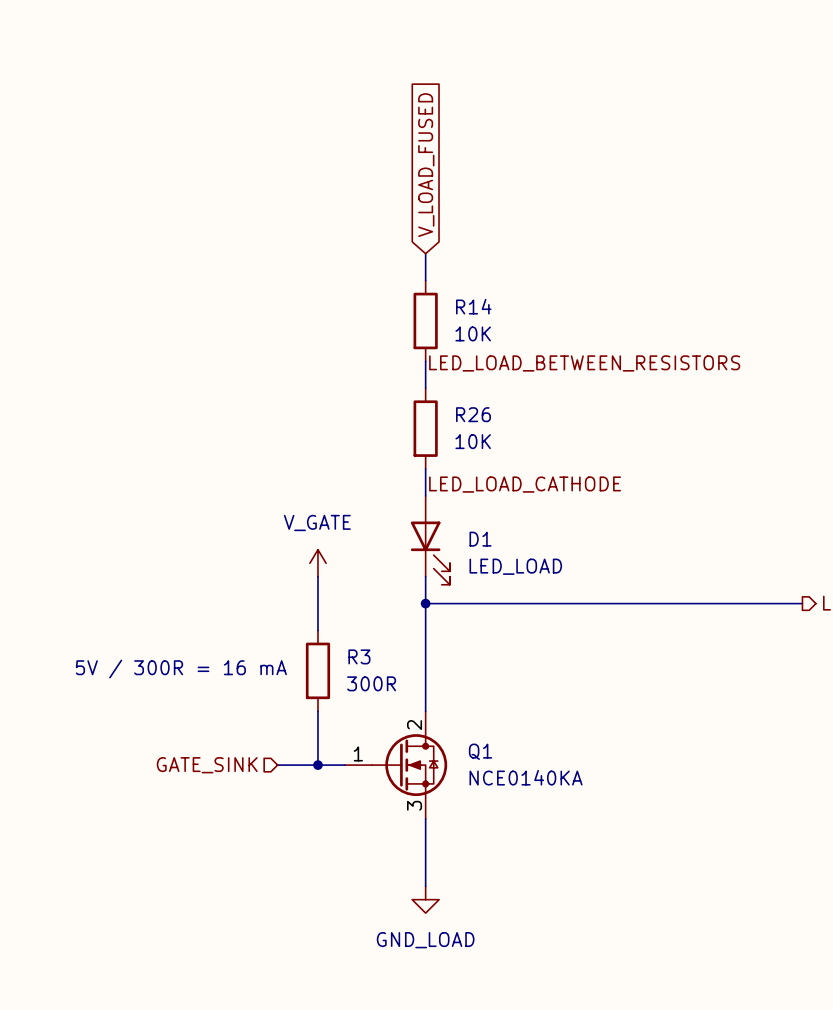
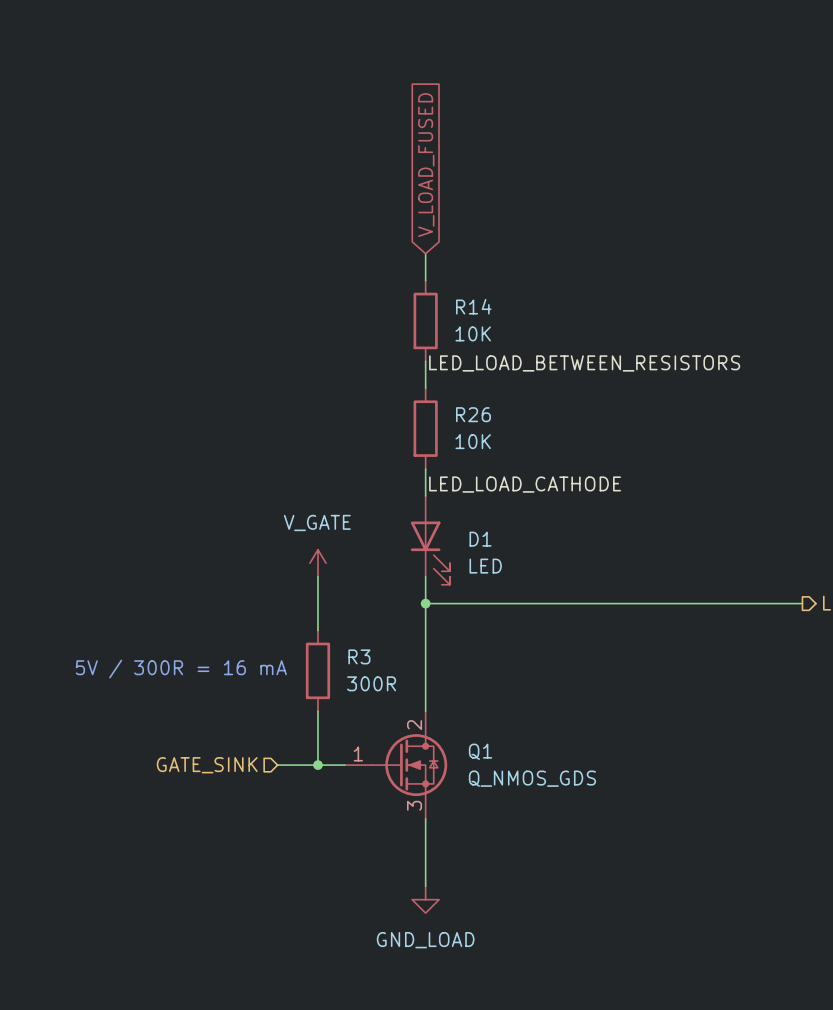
D1 value: LED_LOAD (515, 566) -> LED (485, 566)
Q1 value: NCE0140KA (526, 777) -> Q_NMOS_GDS (532, 778)

